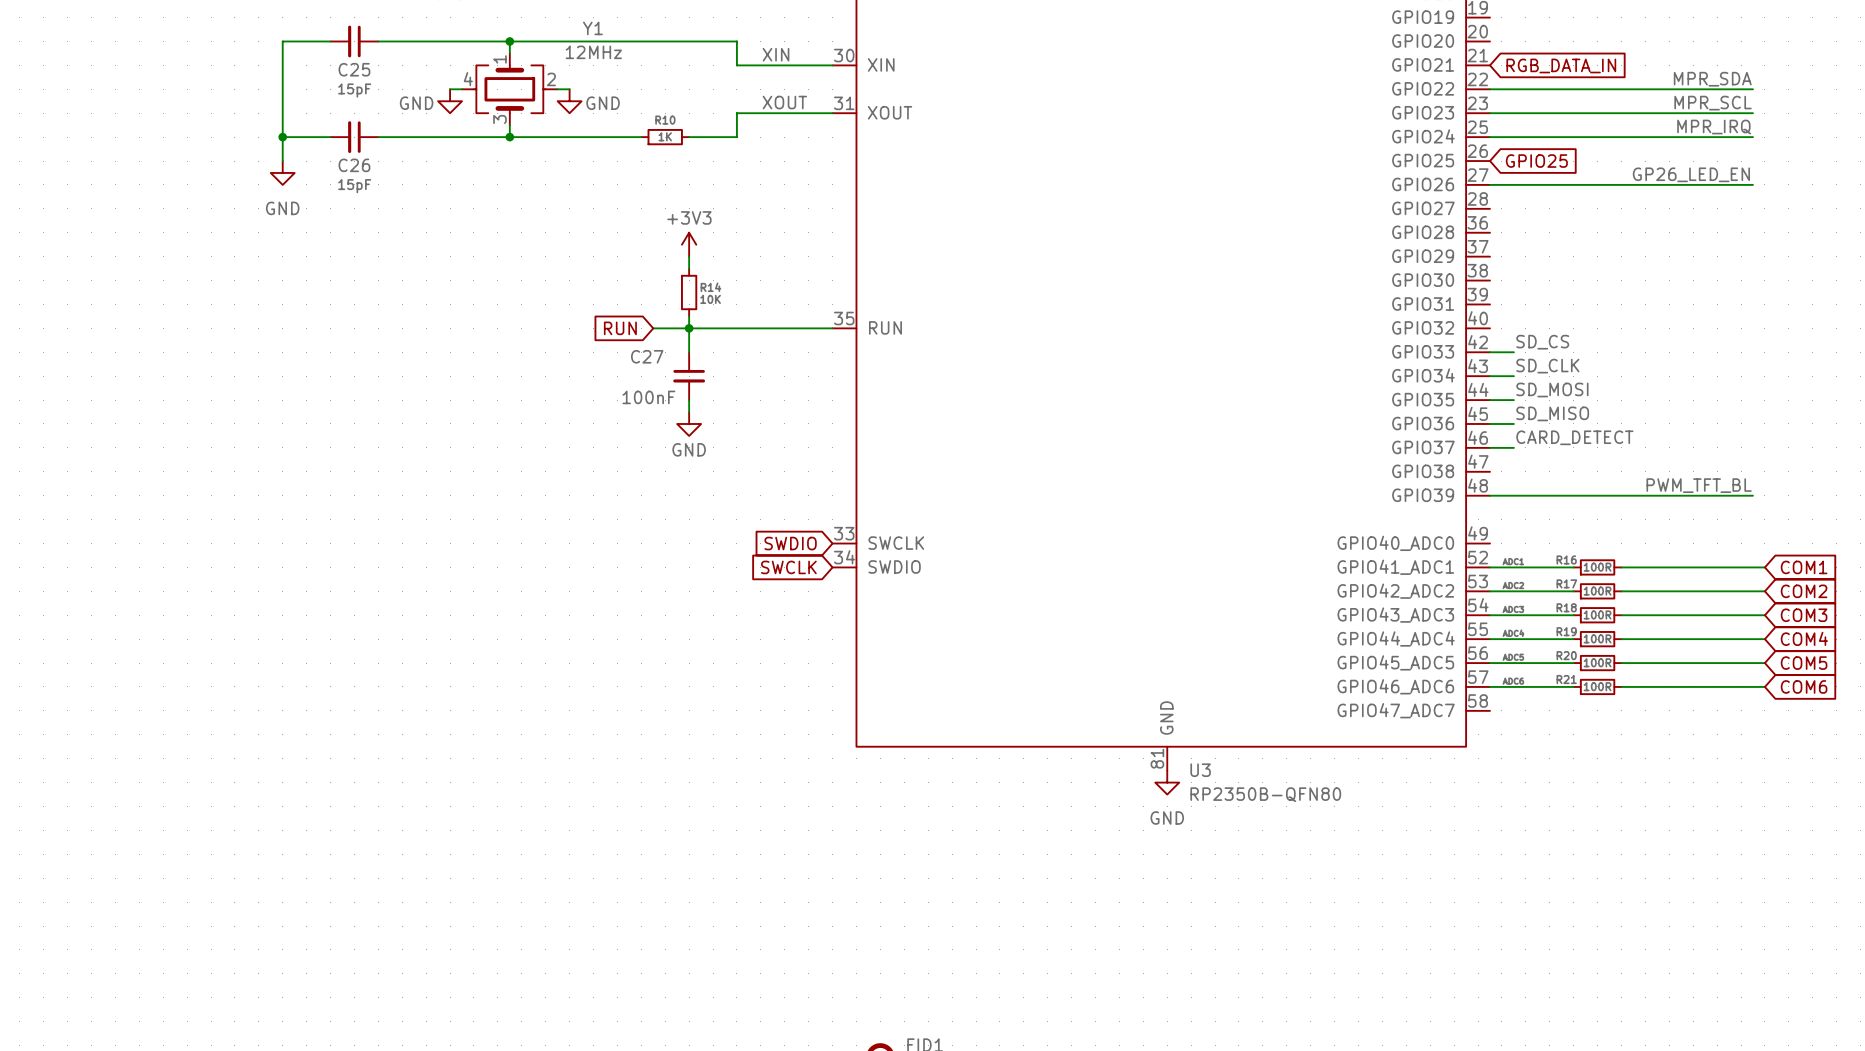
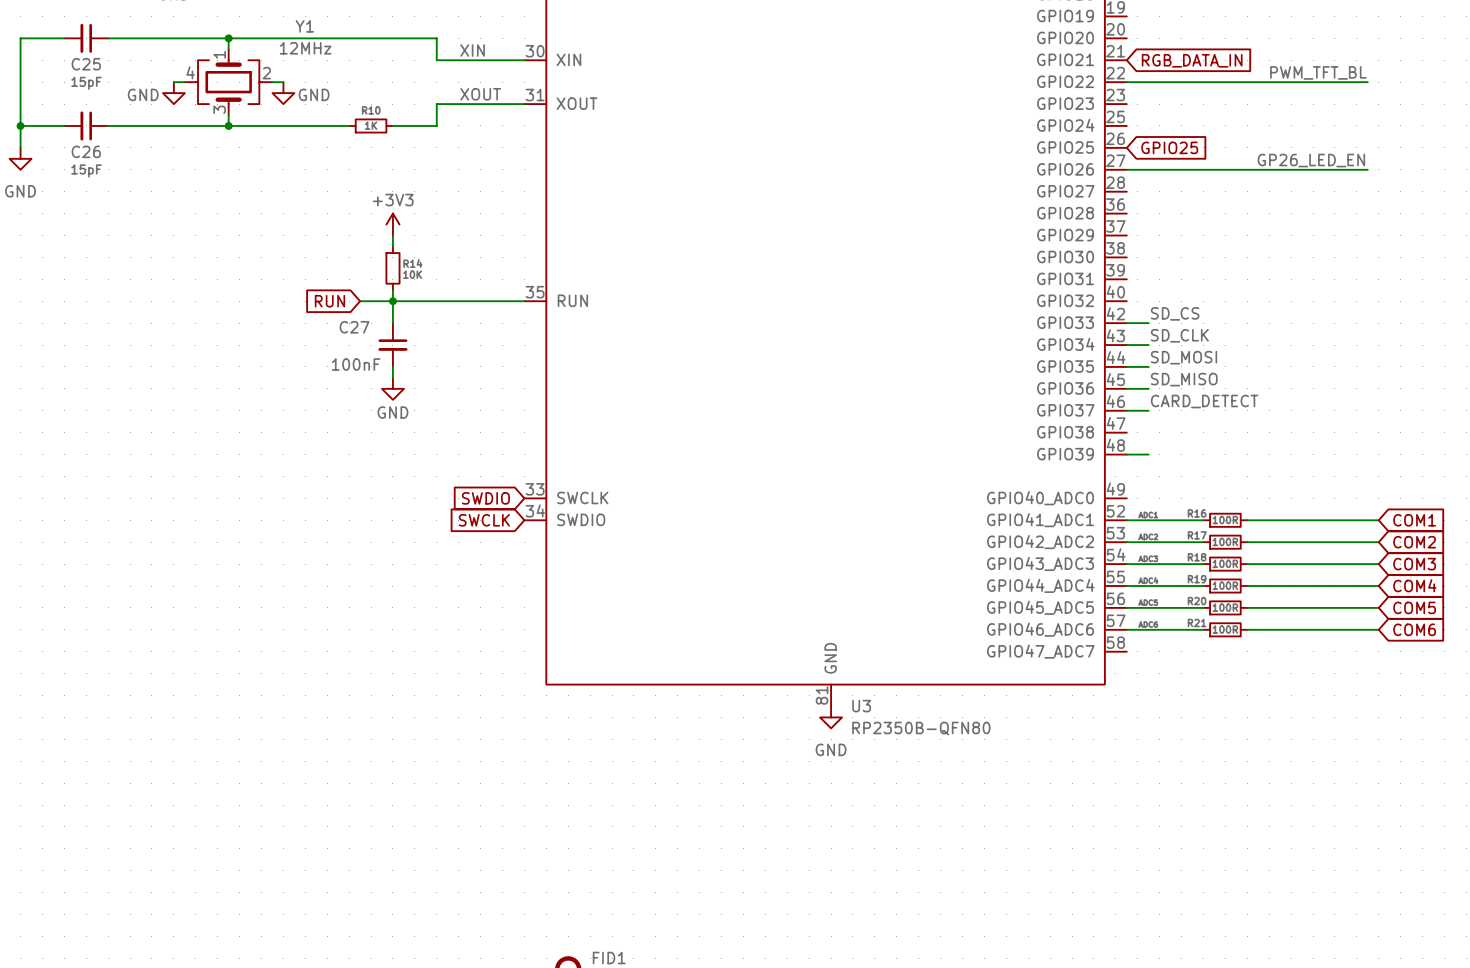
label: MPR_SDA (1712, 79) -> PWM_TFT_BL (1318, 72)
label: MPR_SCL (1713, 103) -> none
wire: (1489, 113) (1752, 113) -> none
label: MPR_IRQ (1714, 127) -> none
wire: (1489, 137) (1752, 137) -> none
label: PWM_TFT_BL (1699, 485) -> none
wire: (1513, 495) (1752, 495) -> none

